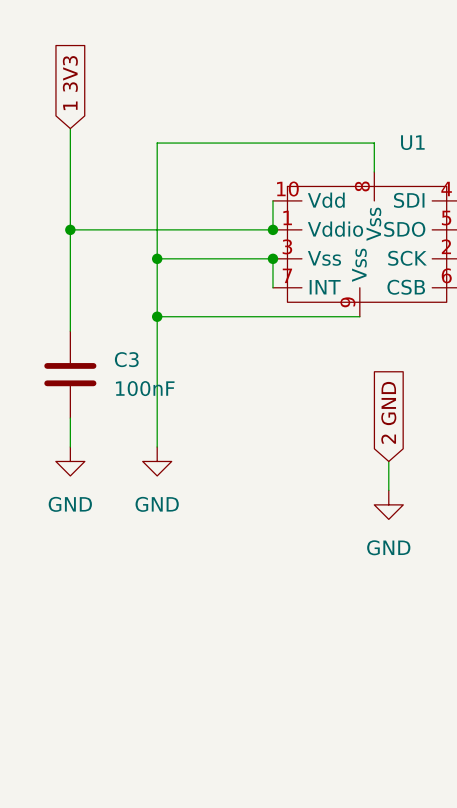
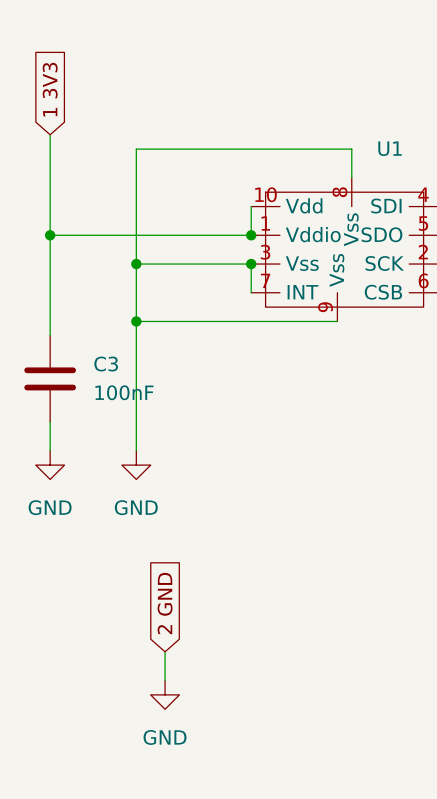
global label position: 2 GND (388, 412) -> 2 GND (165, 603)
wire: (388, 461) (388, 490) -> (165, 651) (165, 680)
power symbol position: GND (388, 504) -> GND (165, 694)

